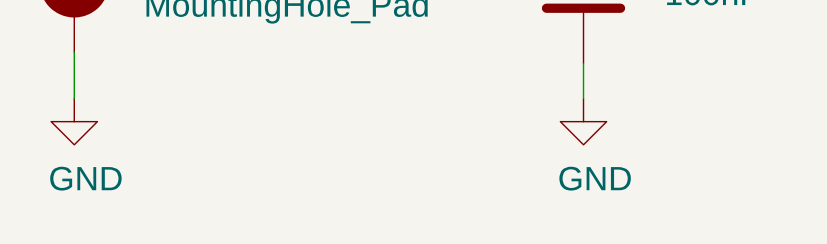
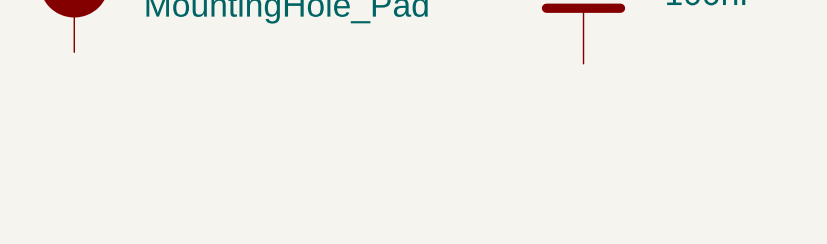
wire: (74, 52) (74, 98) -> none
wire: (583, 63) (583, 98) -> none
power symbol: GND (74, 121) -> none
power symbol: GND (583, 121) -> none

